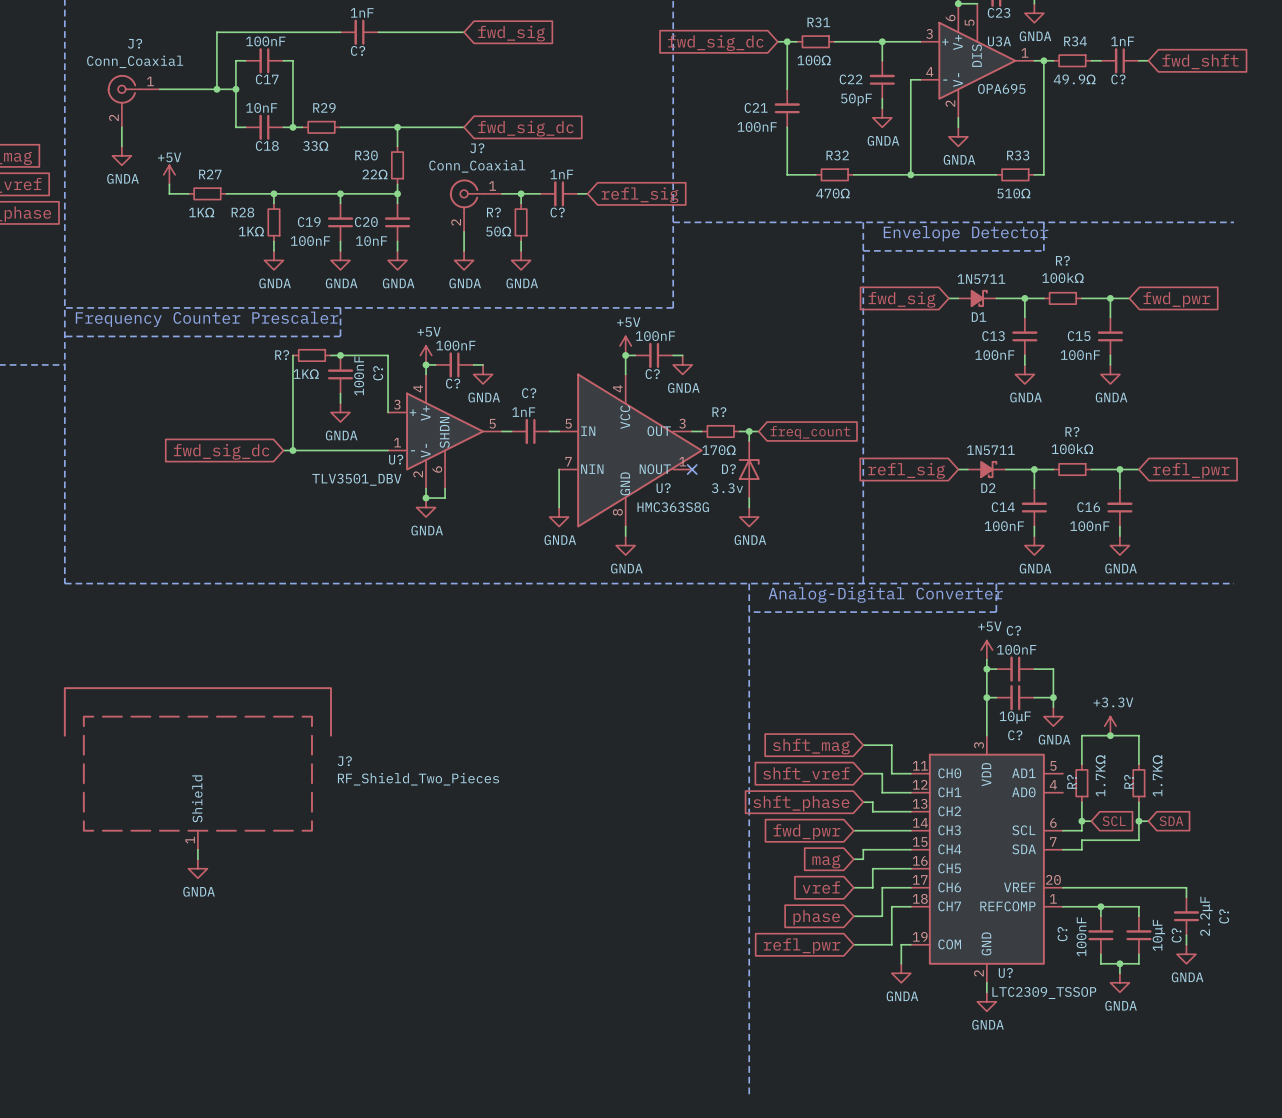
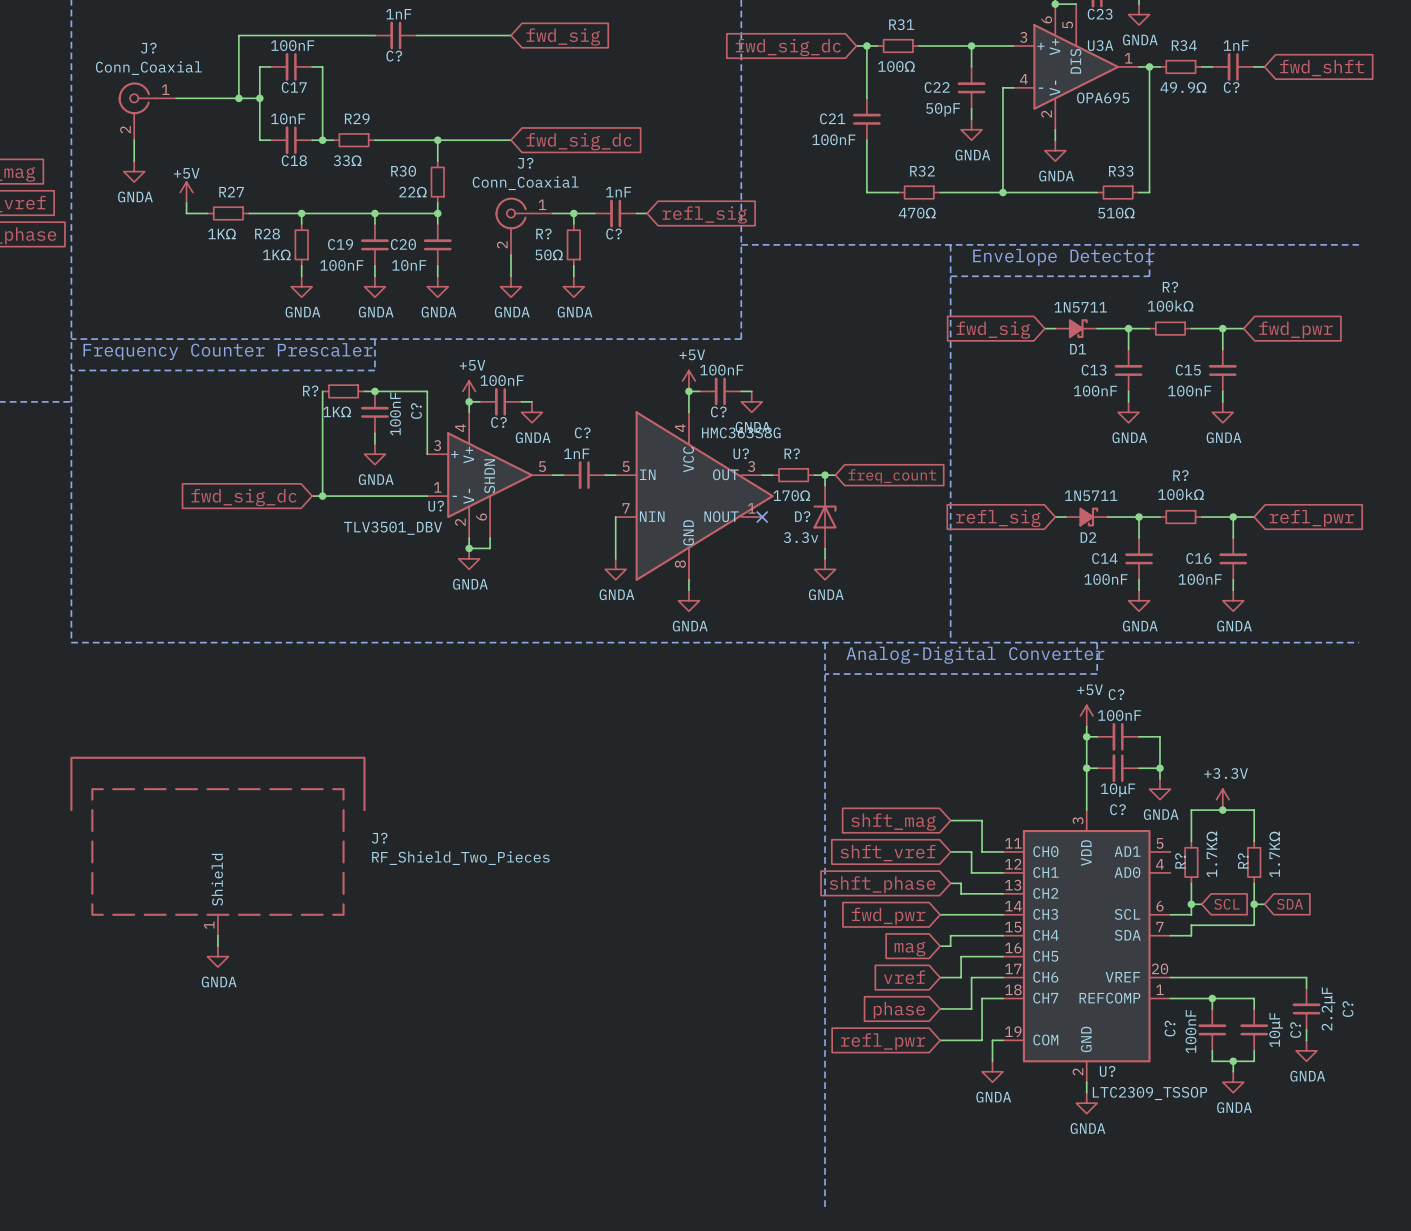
U? name position: U? (663, 488) -> U? (741, 453)
U? value position: HMC363S8G (673, 507) -> HMC363S8G (741, 432)

